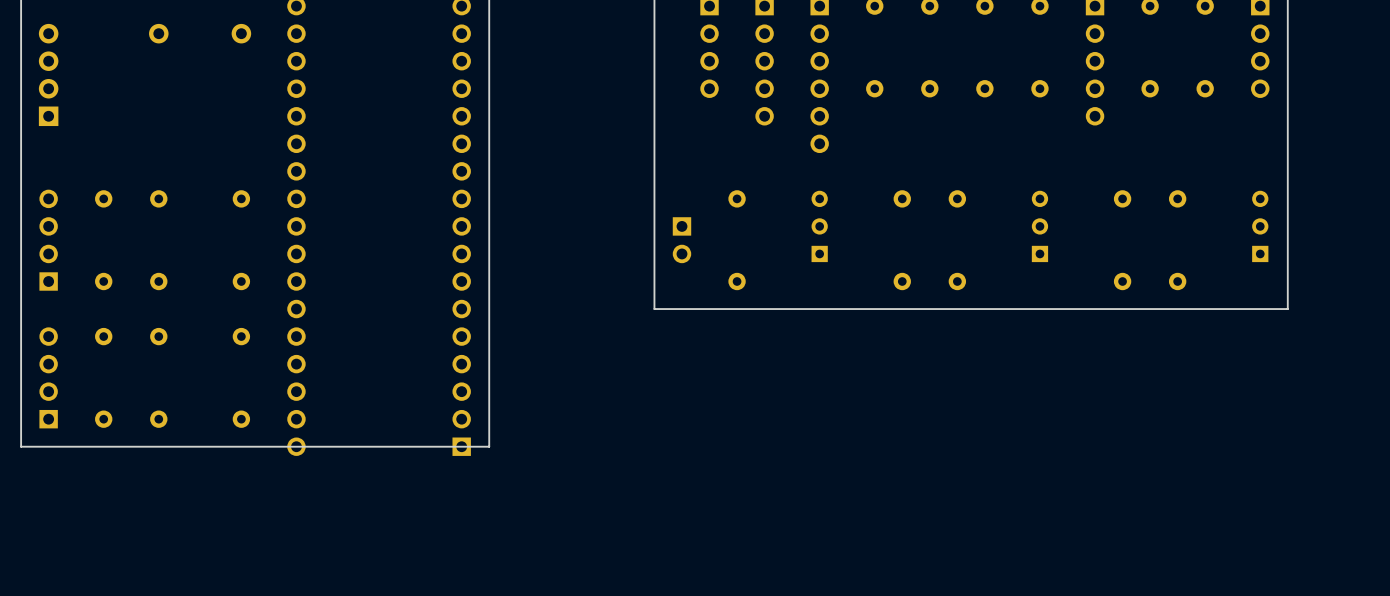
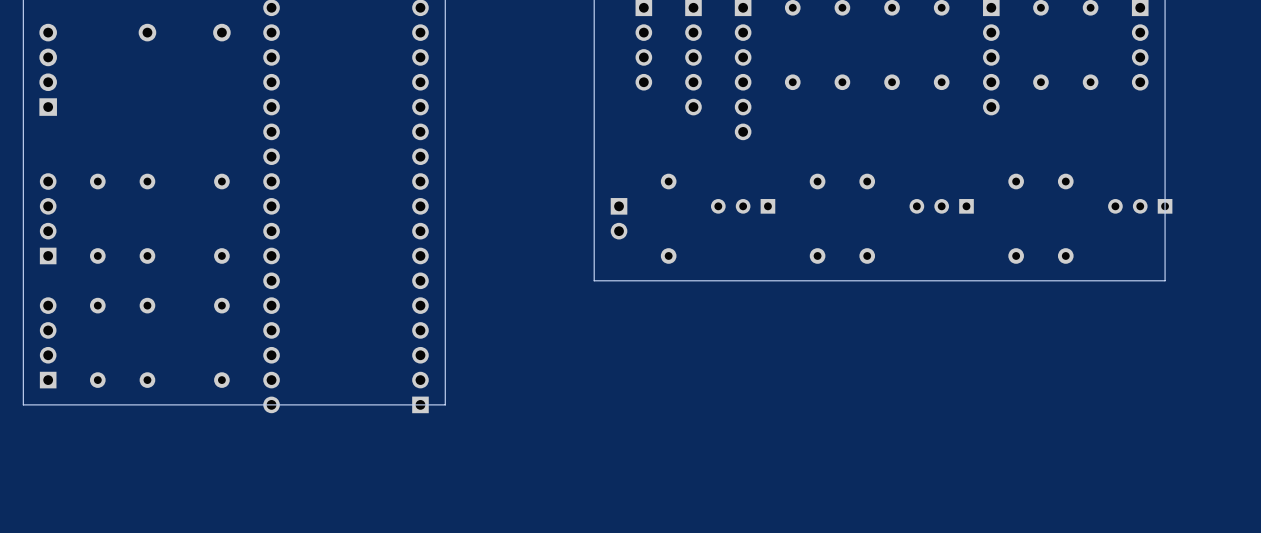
part rotation: 0° (819, 226) -> 90° counterclockwise (743, 206)
part rotation: 0° (1039, 226) -> 90° counterclockwise (941, 206)
part rotation: 0° (1260, 226) -> 90° counterclockwise (1140, 206)

